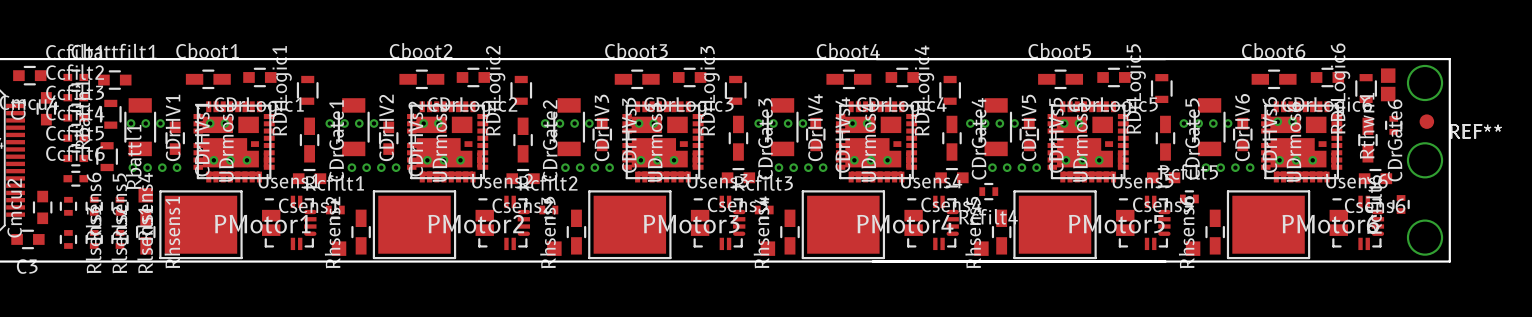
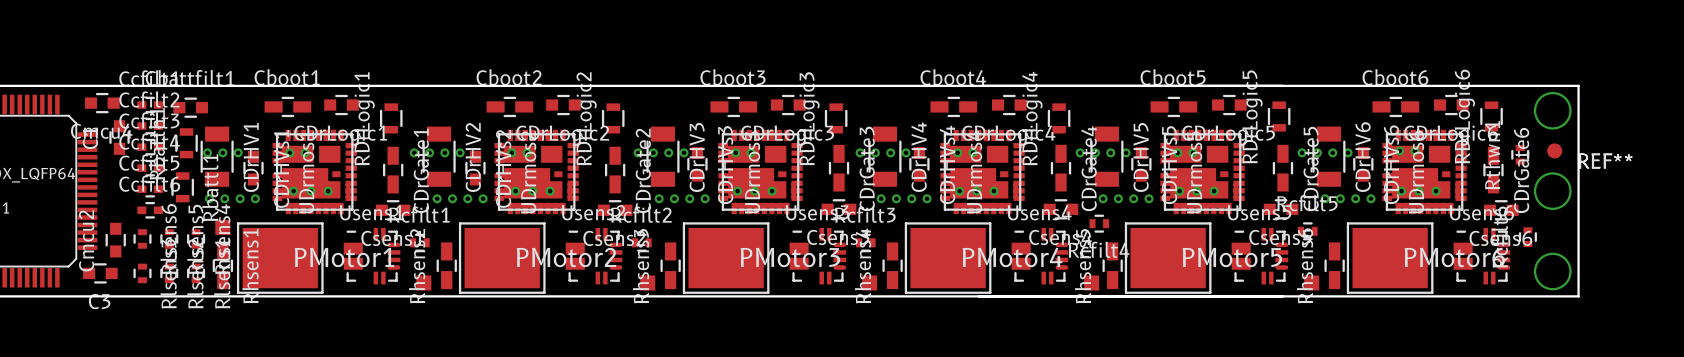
part: (1388, 75) -> none
part: (1388, 94) -> none

